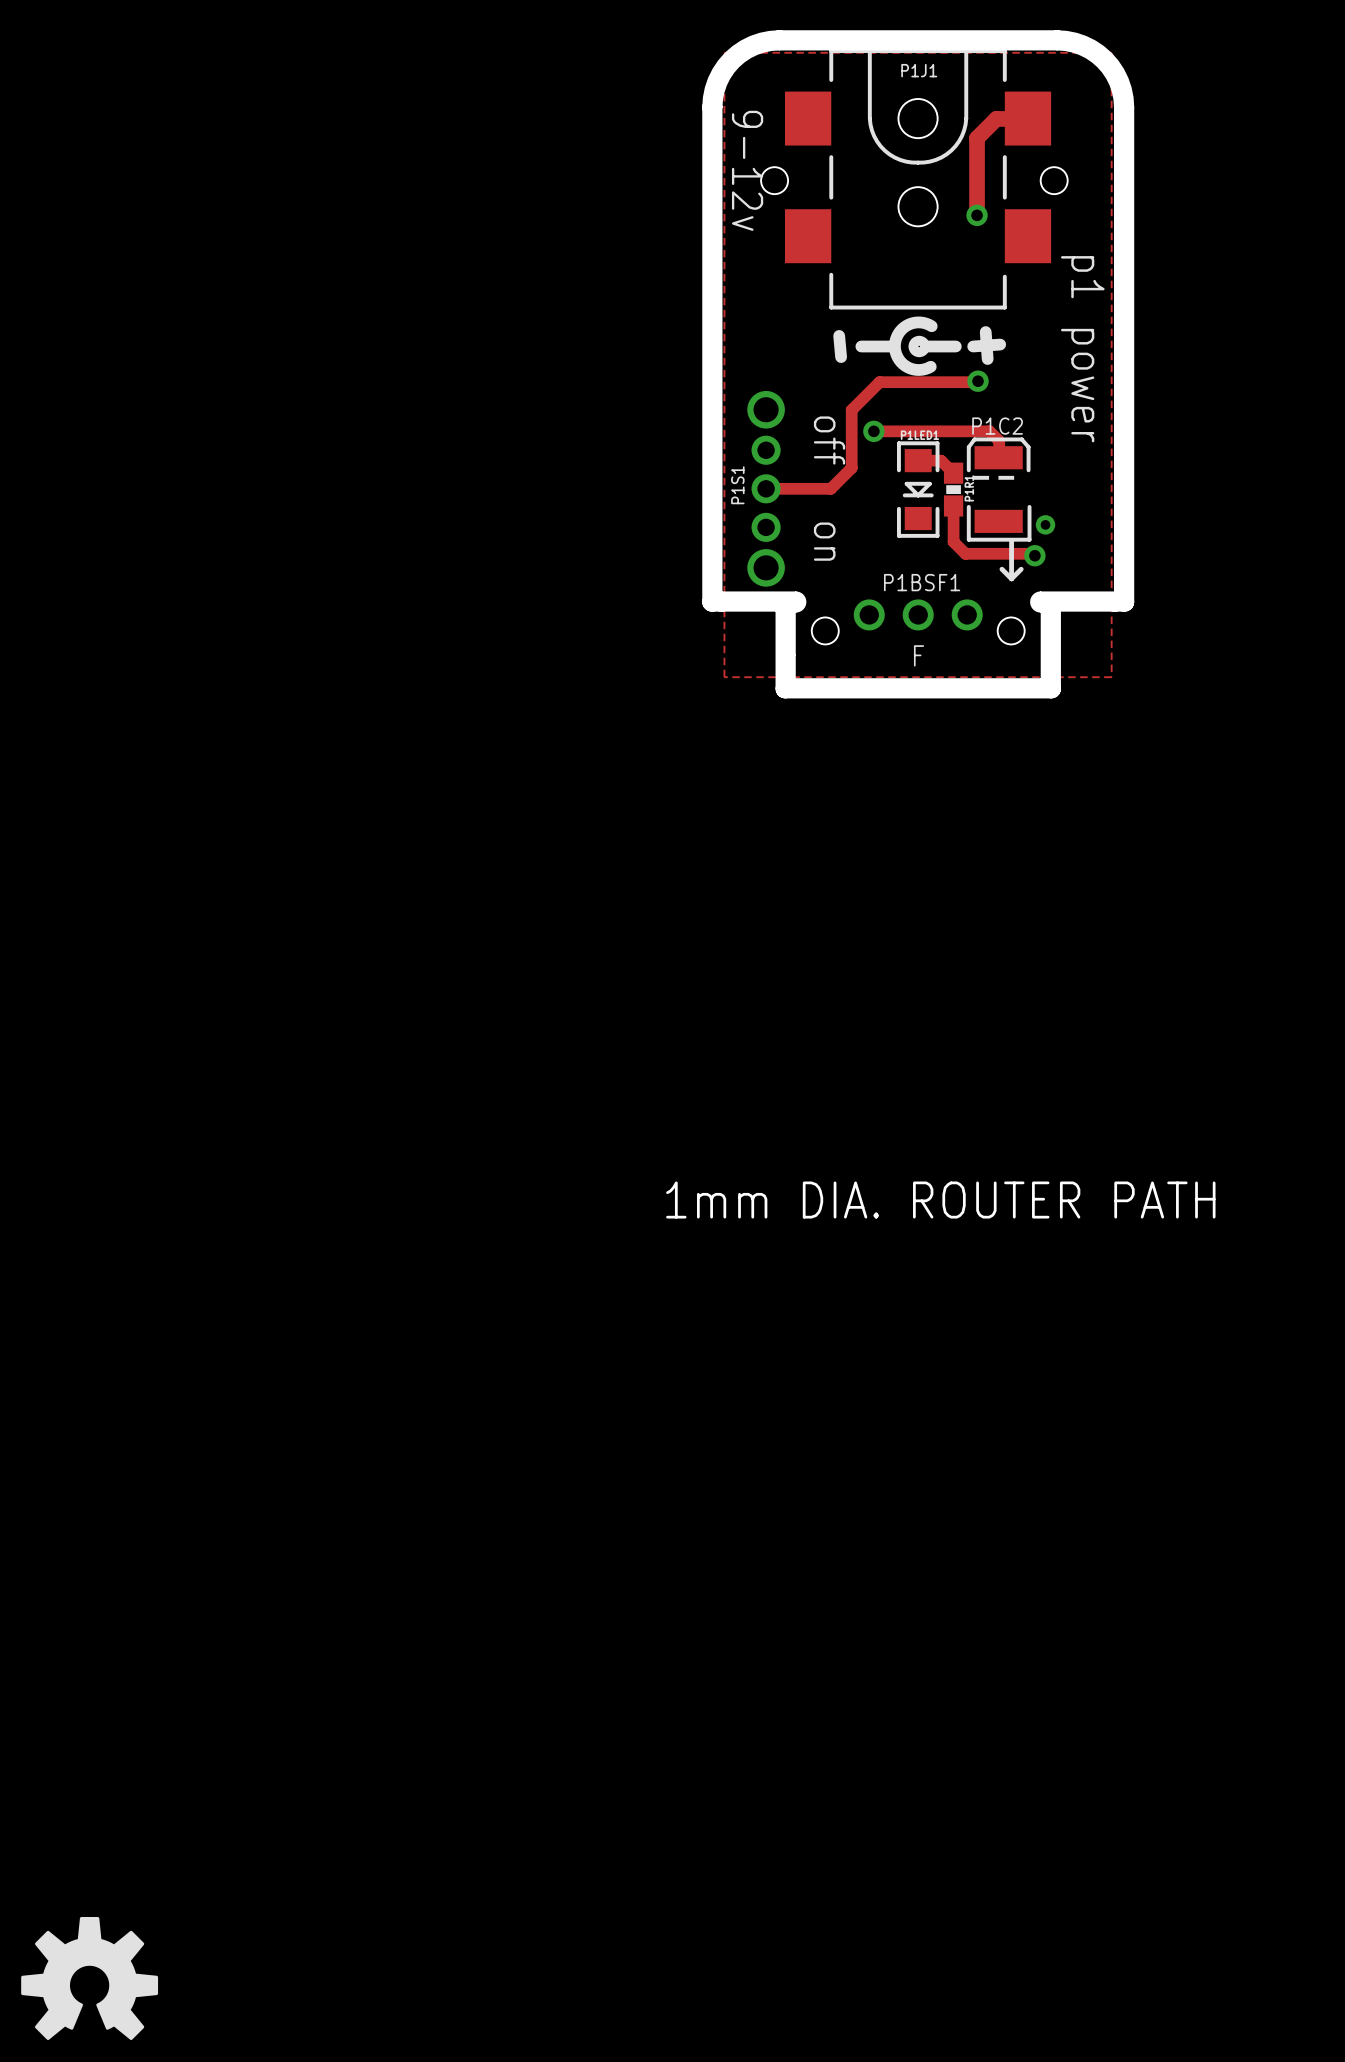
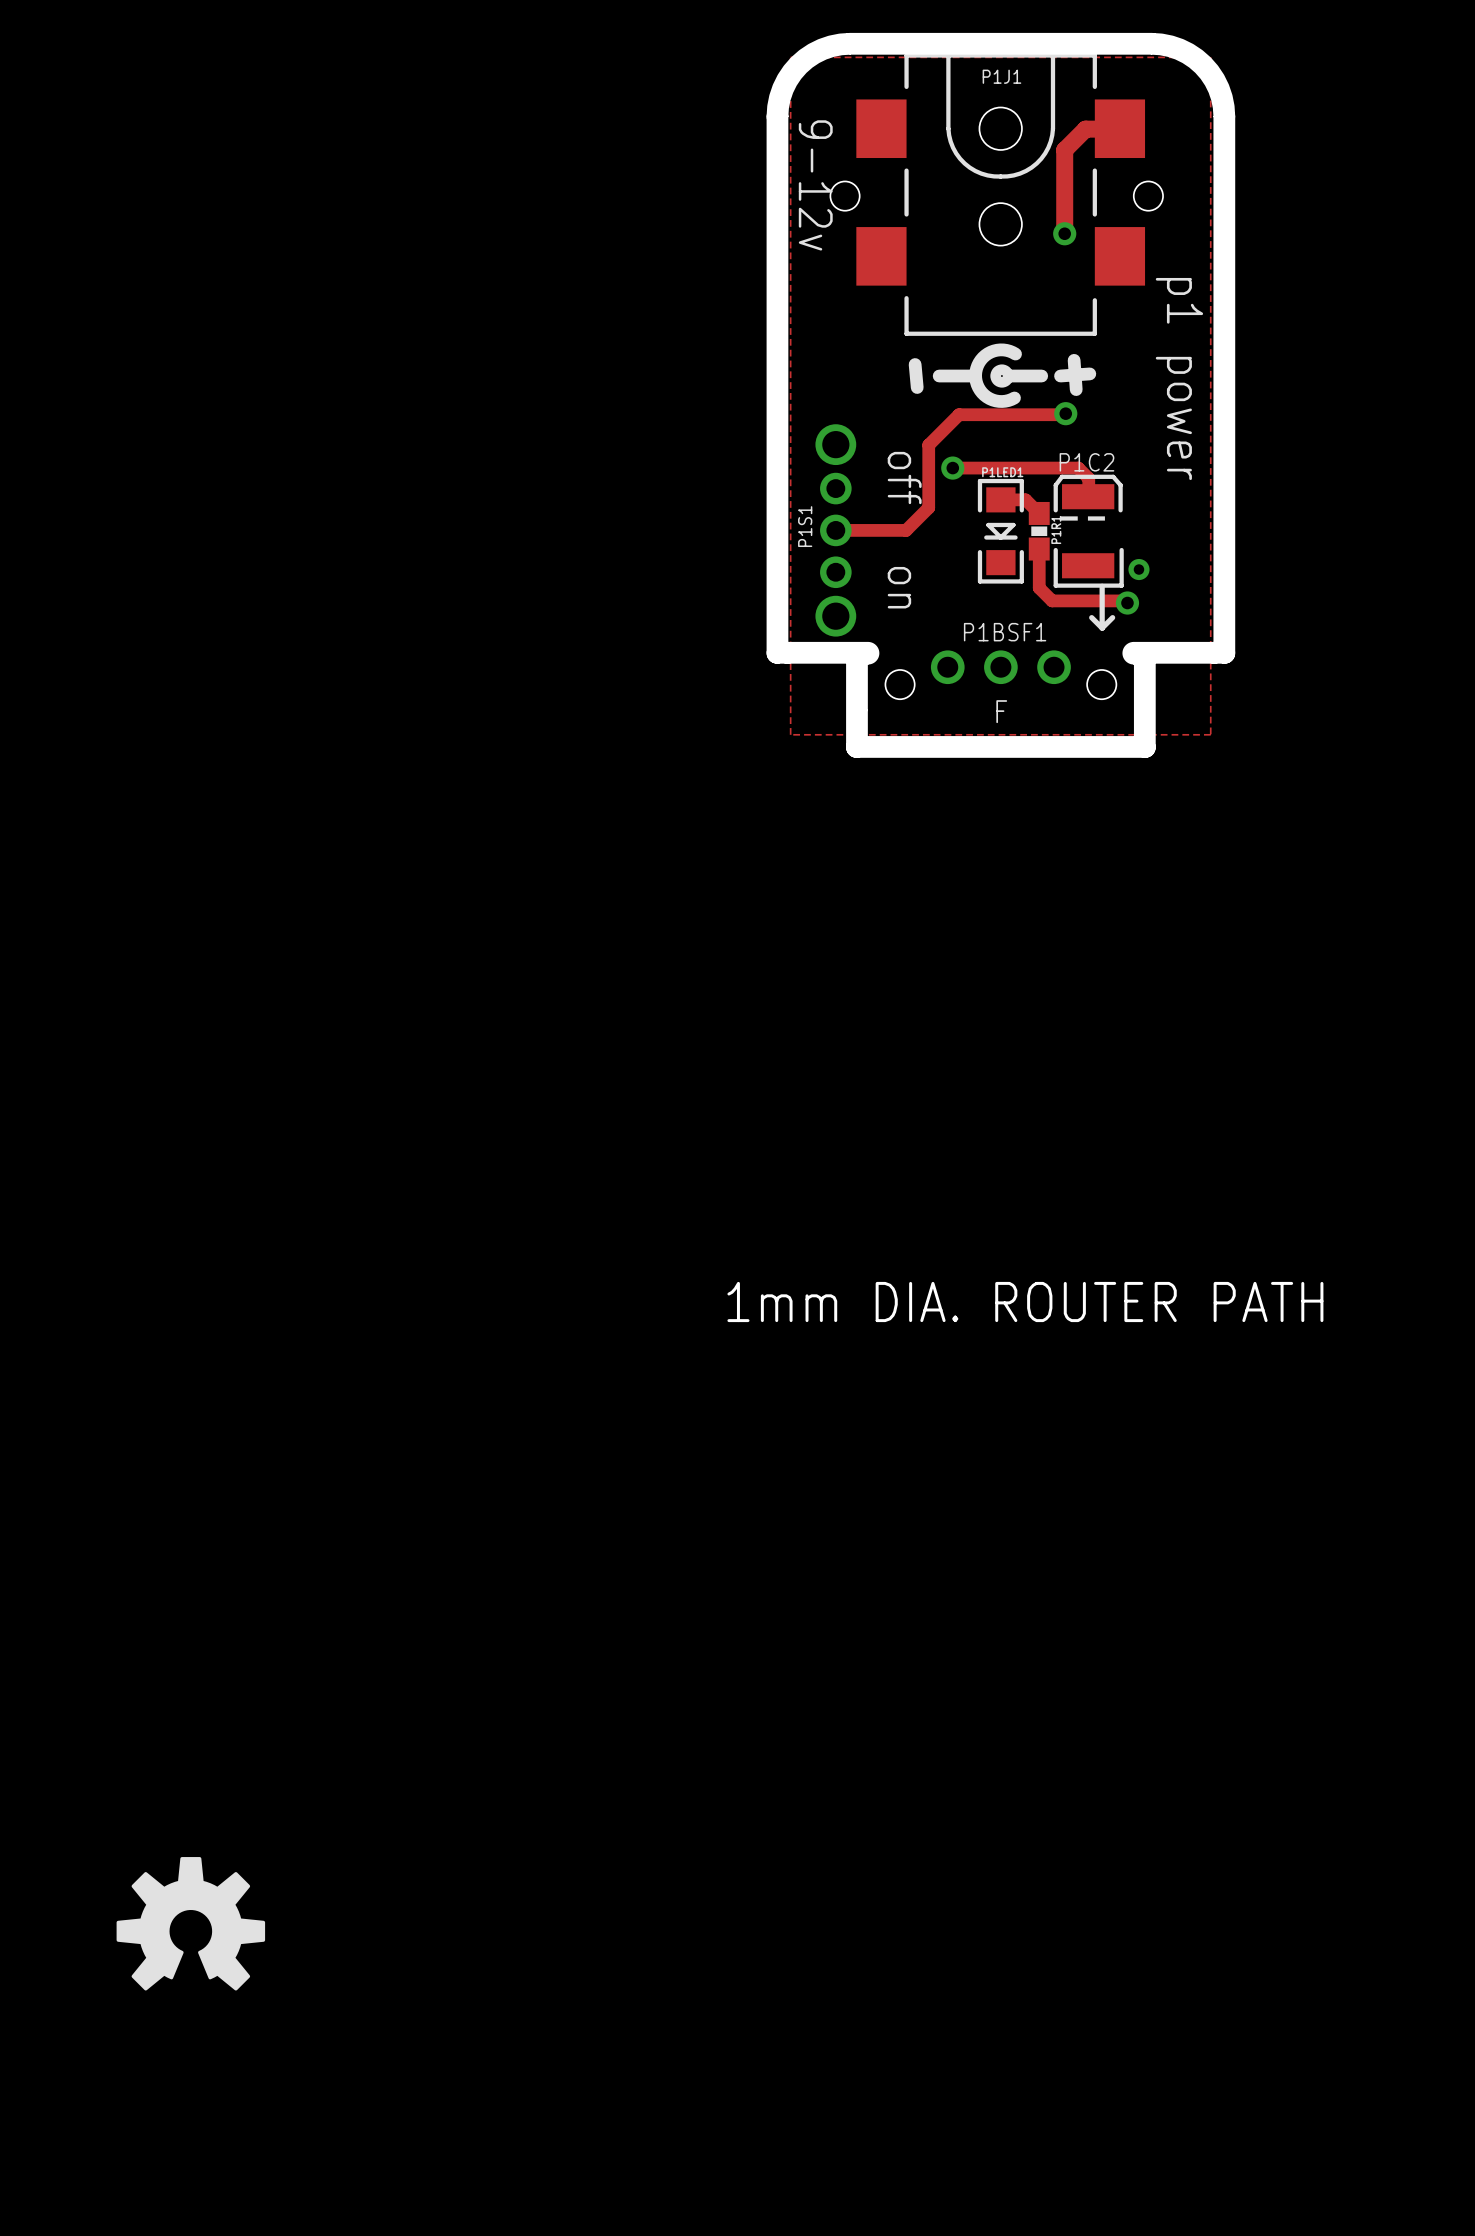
drawing position: (89, 1978) -> (190, 1923)

